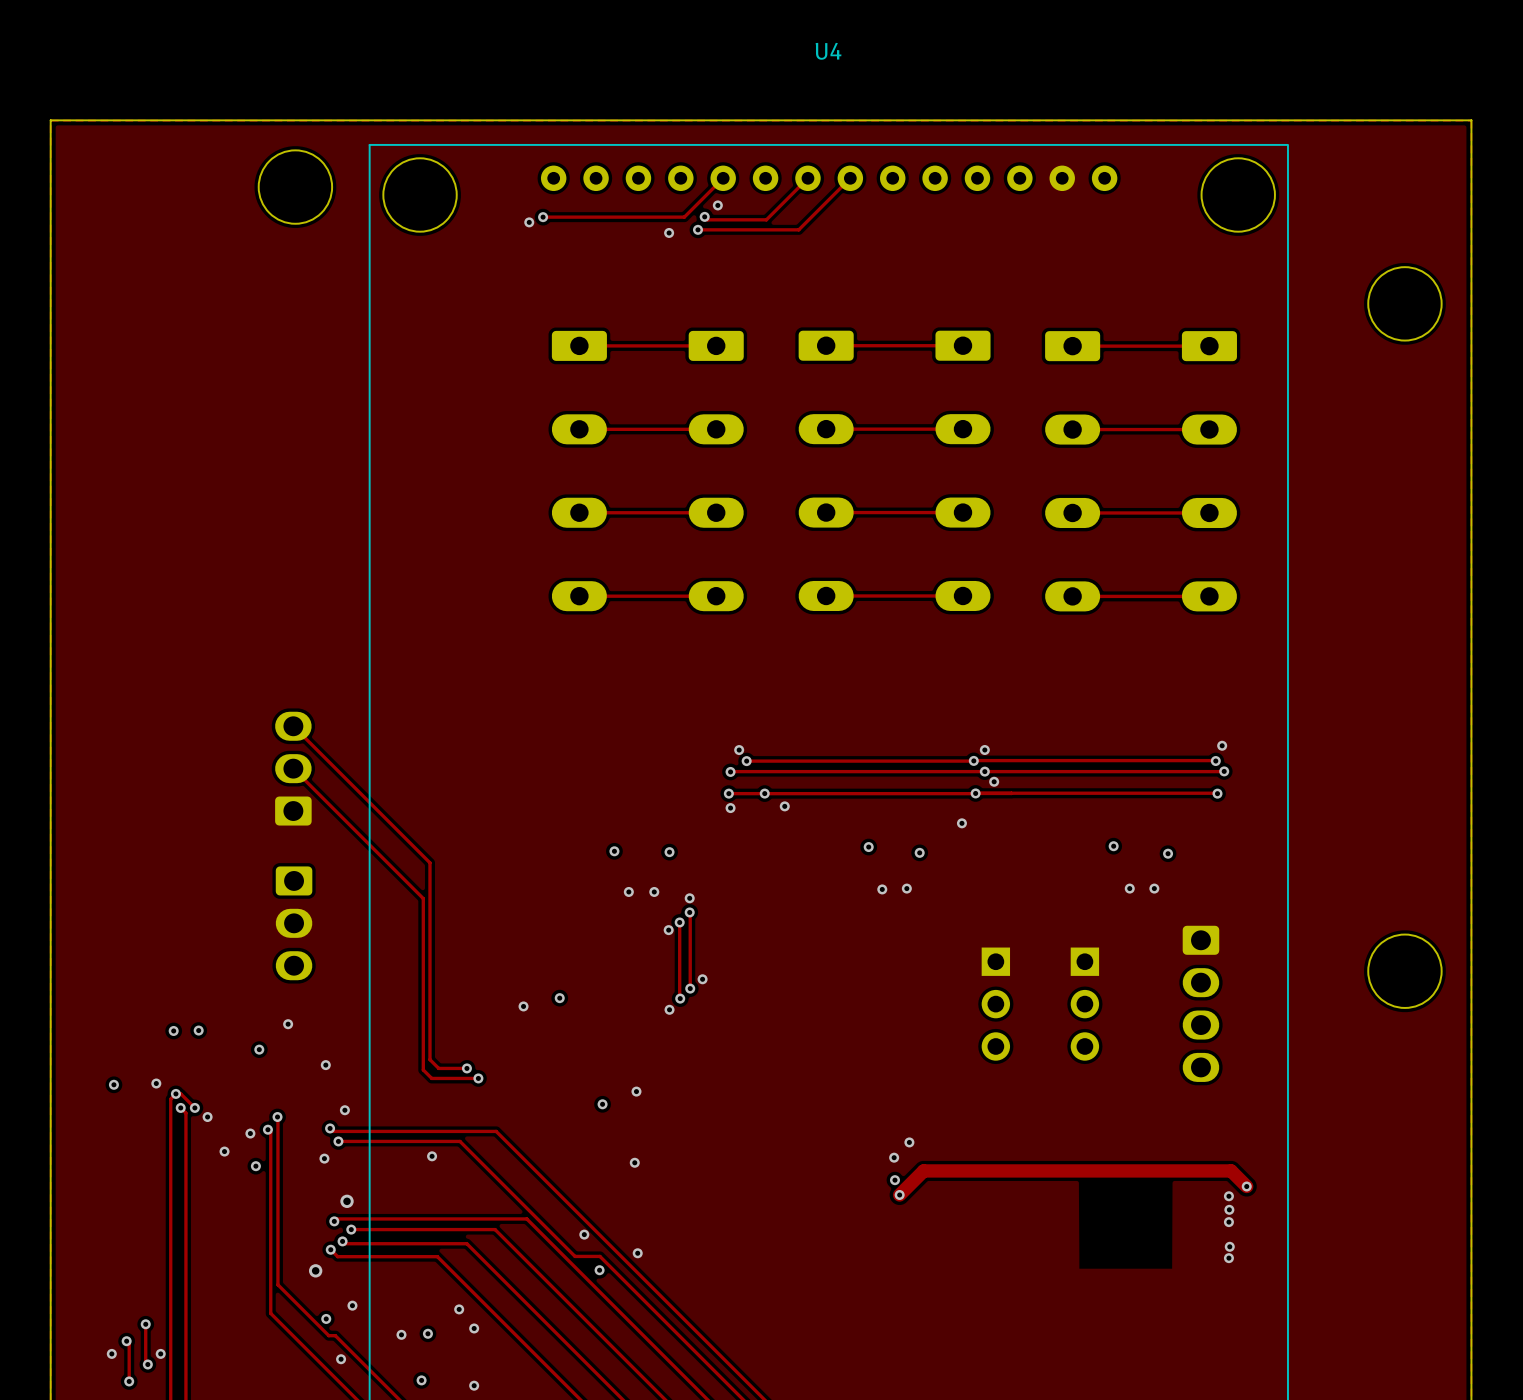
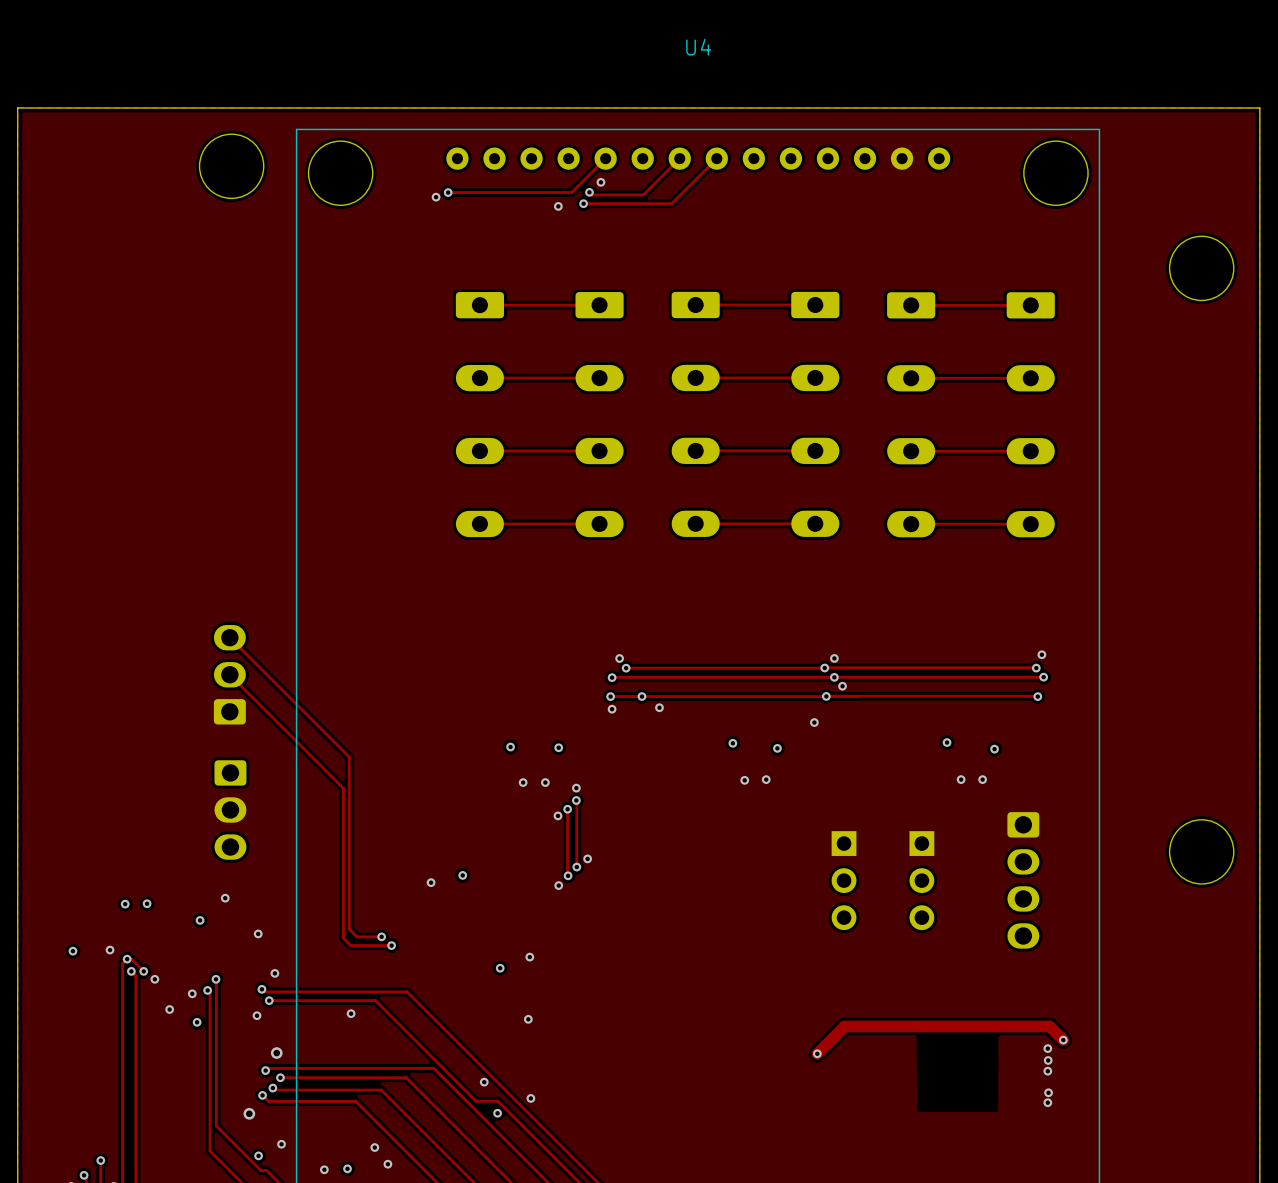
via: (909, 1142) -> none
via: (894, 1157) -> none
track: (996, 1170) (923, 1170) (899, 1194) -> (844, 1026) (817, 1053)
via: (894, 1180) -> none
via: (899, 1194) -> none
via: none -> (817, 1053)

